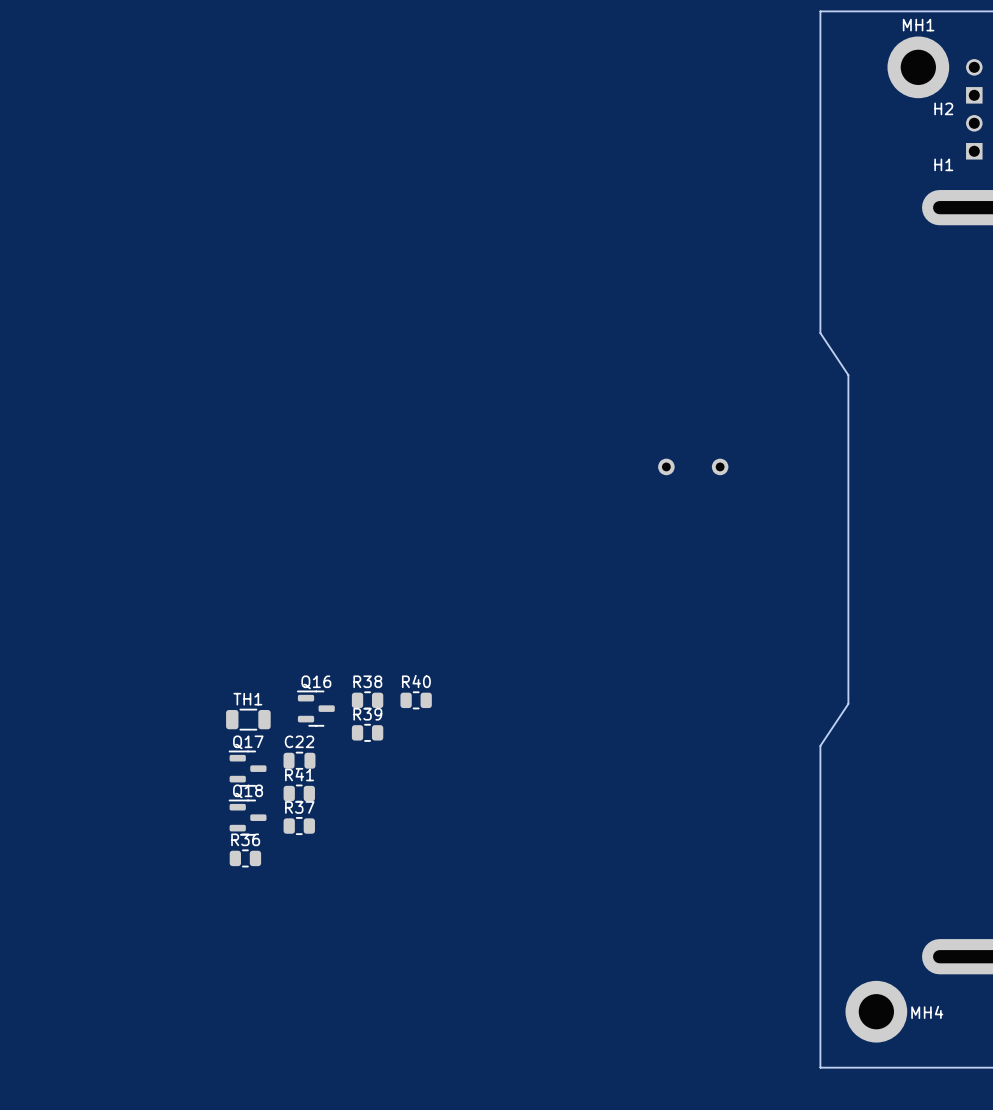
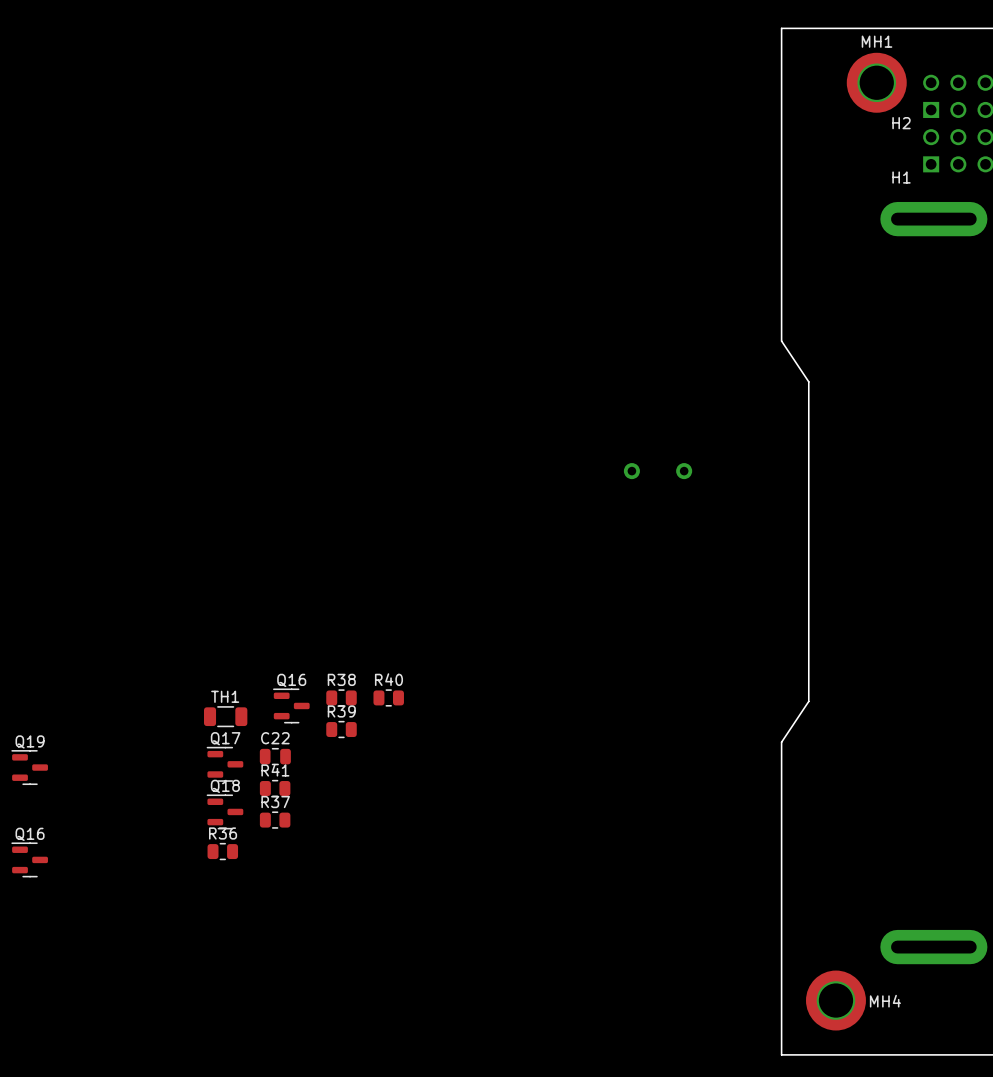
Q19: none -> (29, 767)
Q16: none -> (29, 859)

